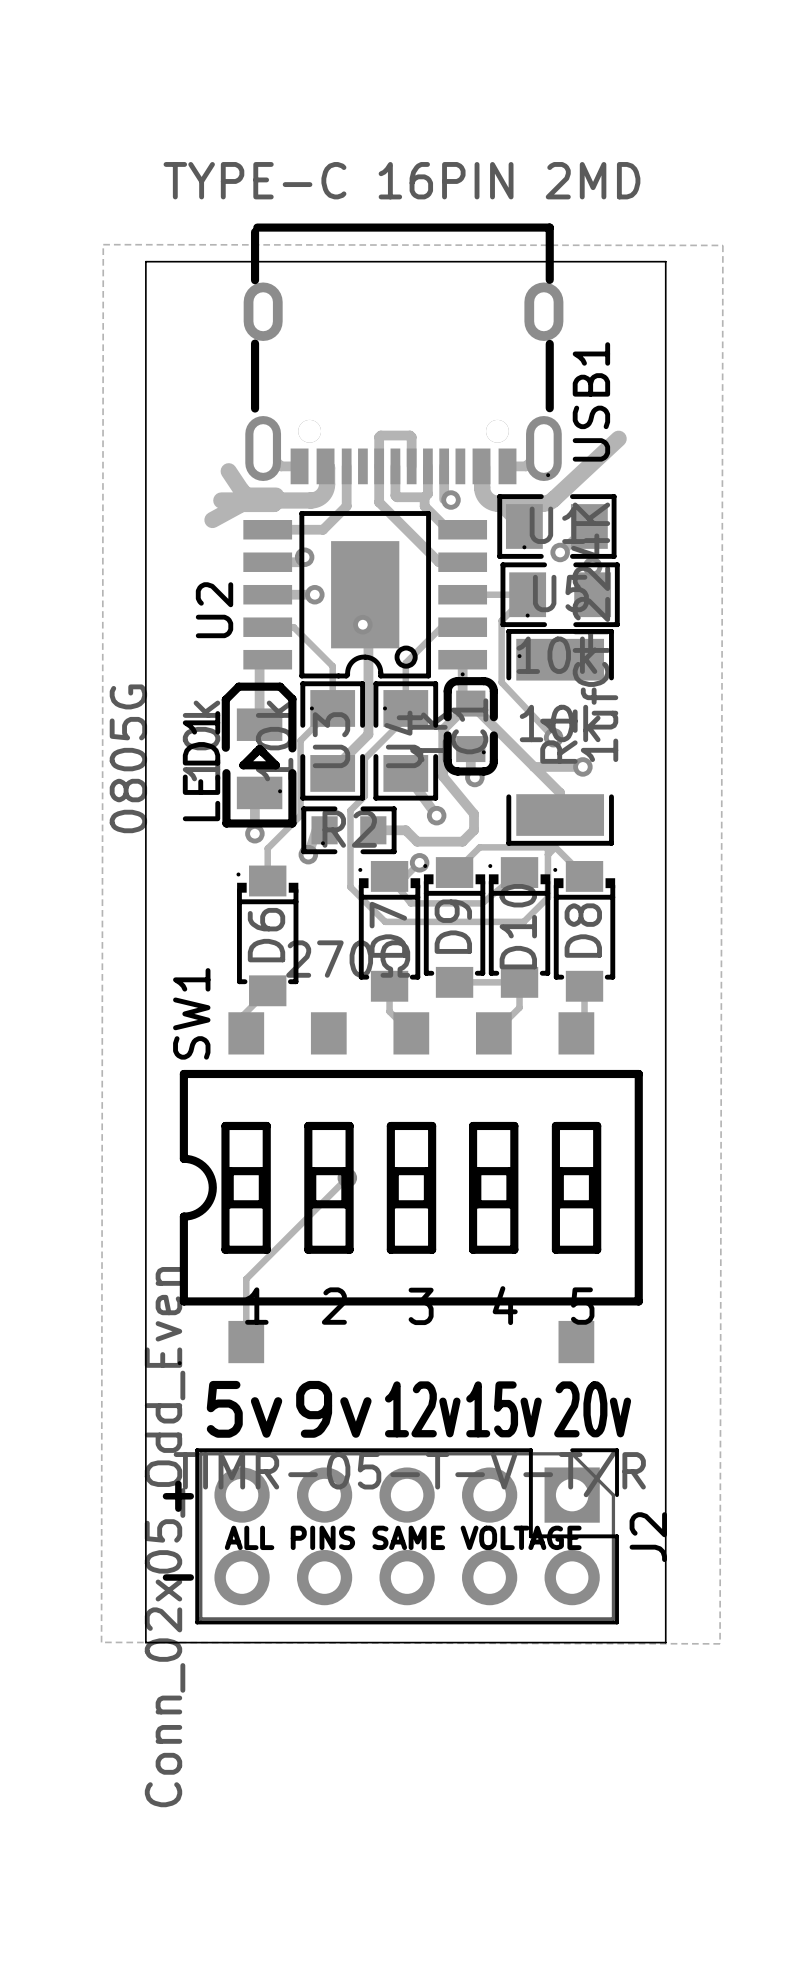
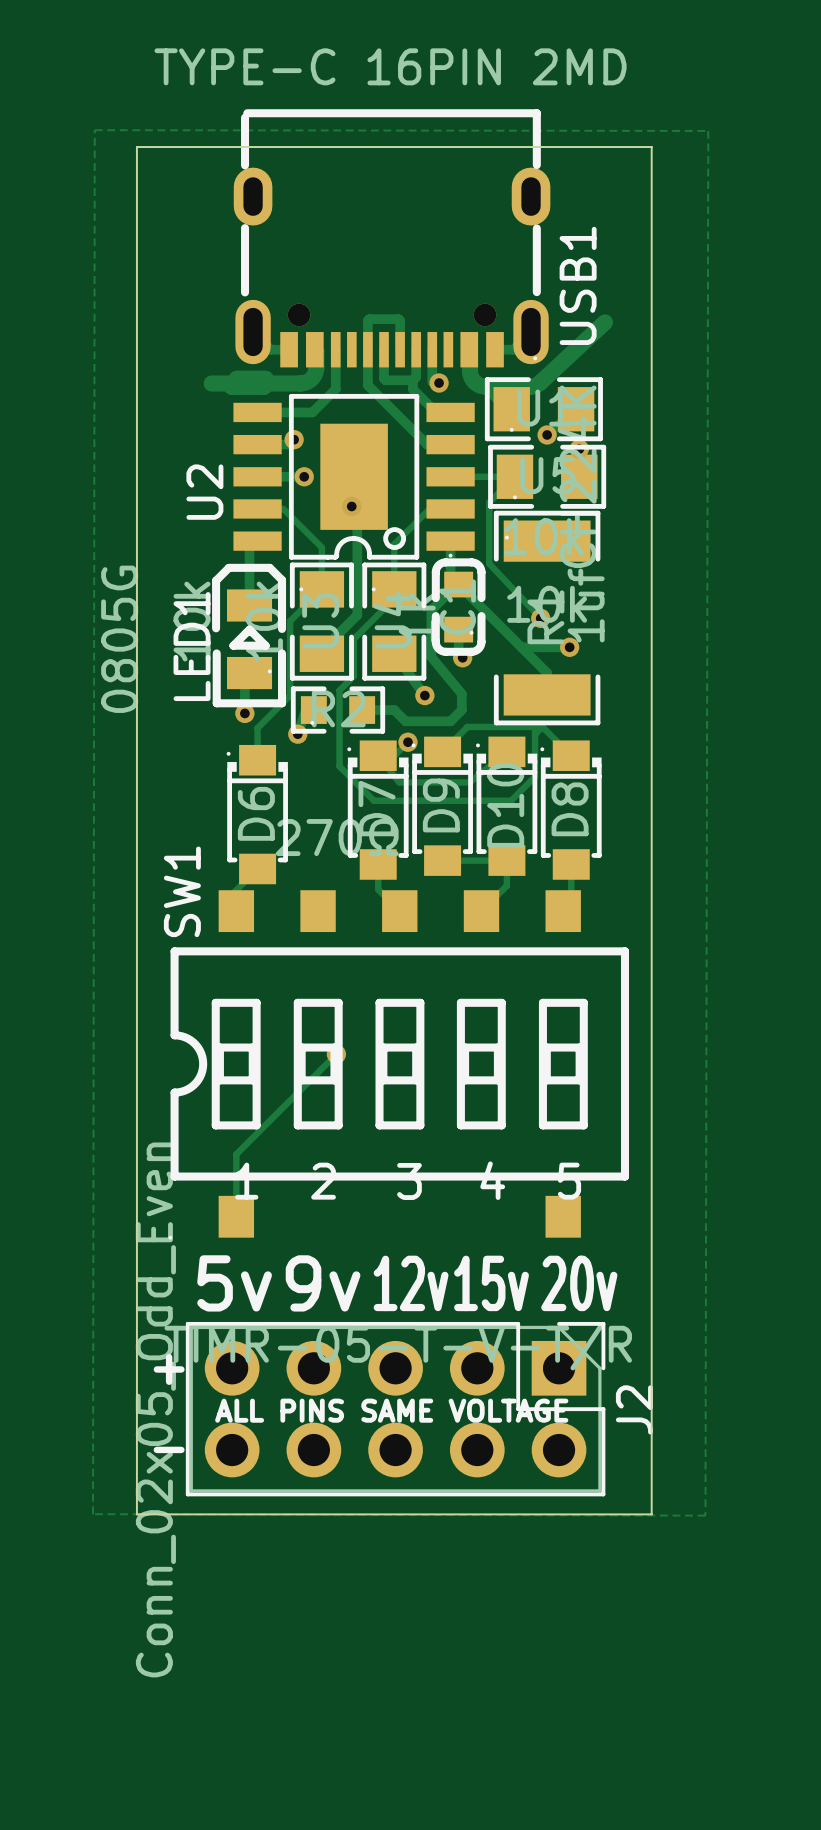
track: (228, 471) (248, 500) -> none
track: (241, 503) (212, 520) -> none

